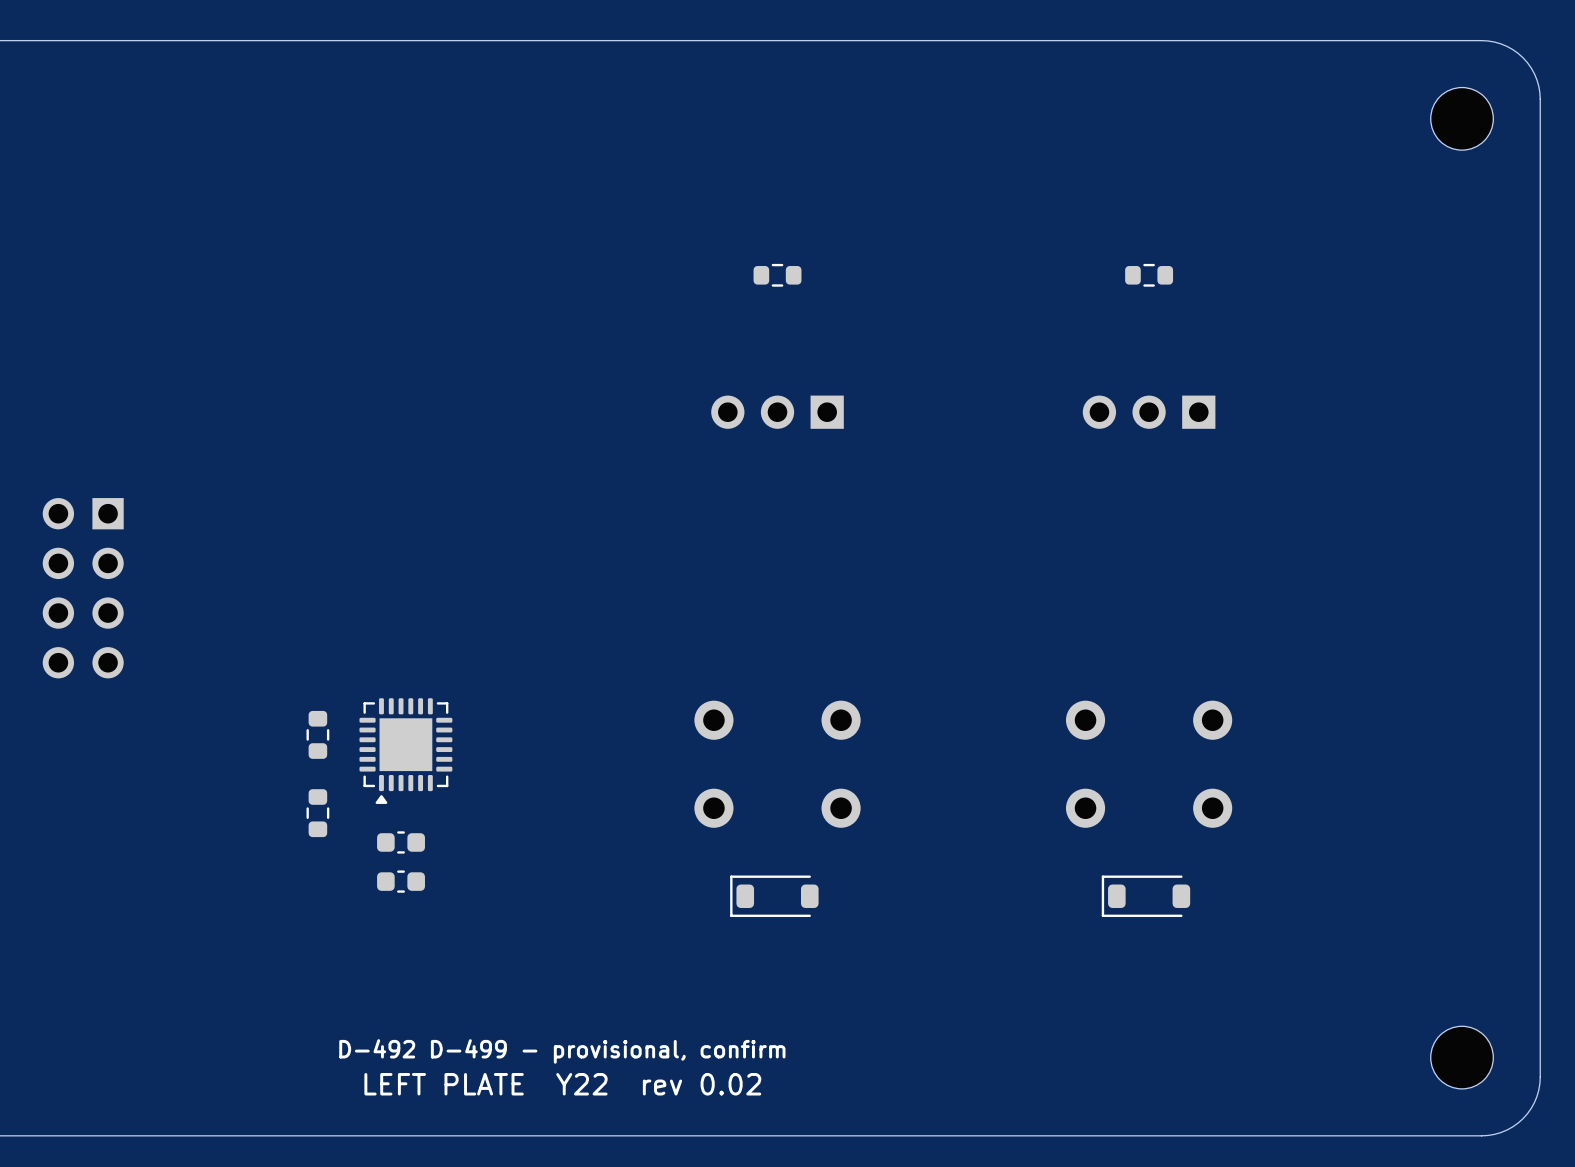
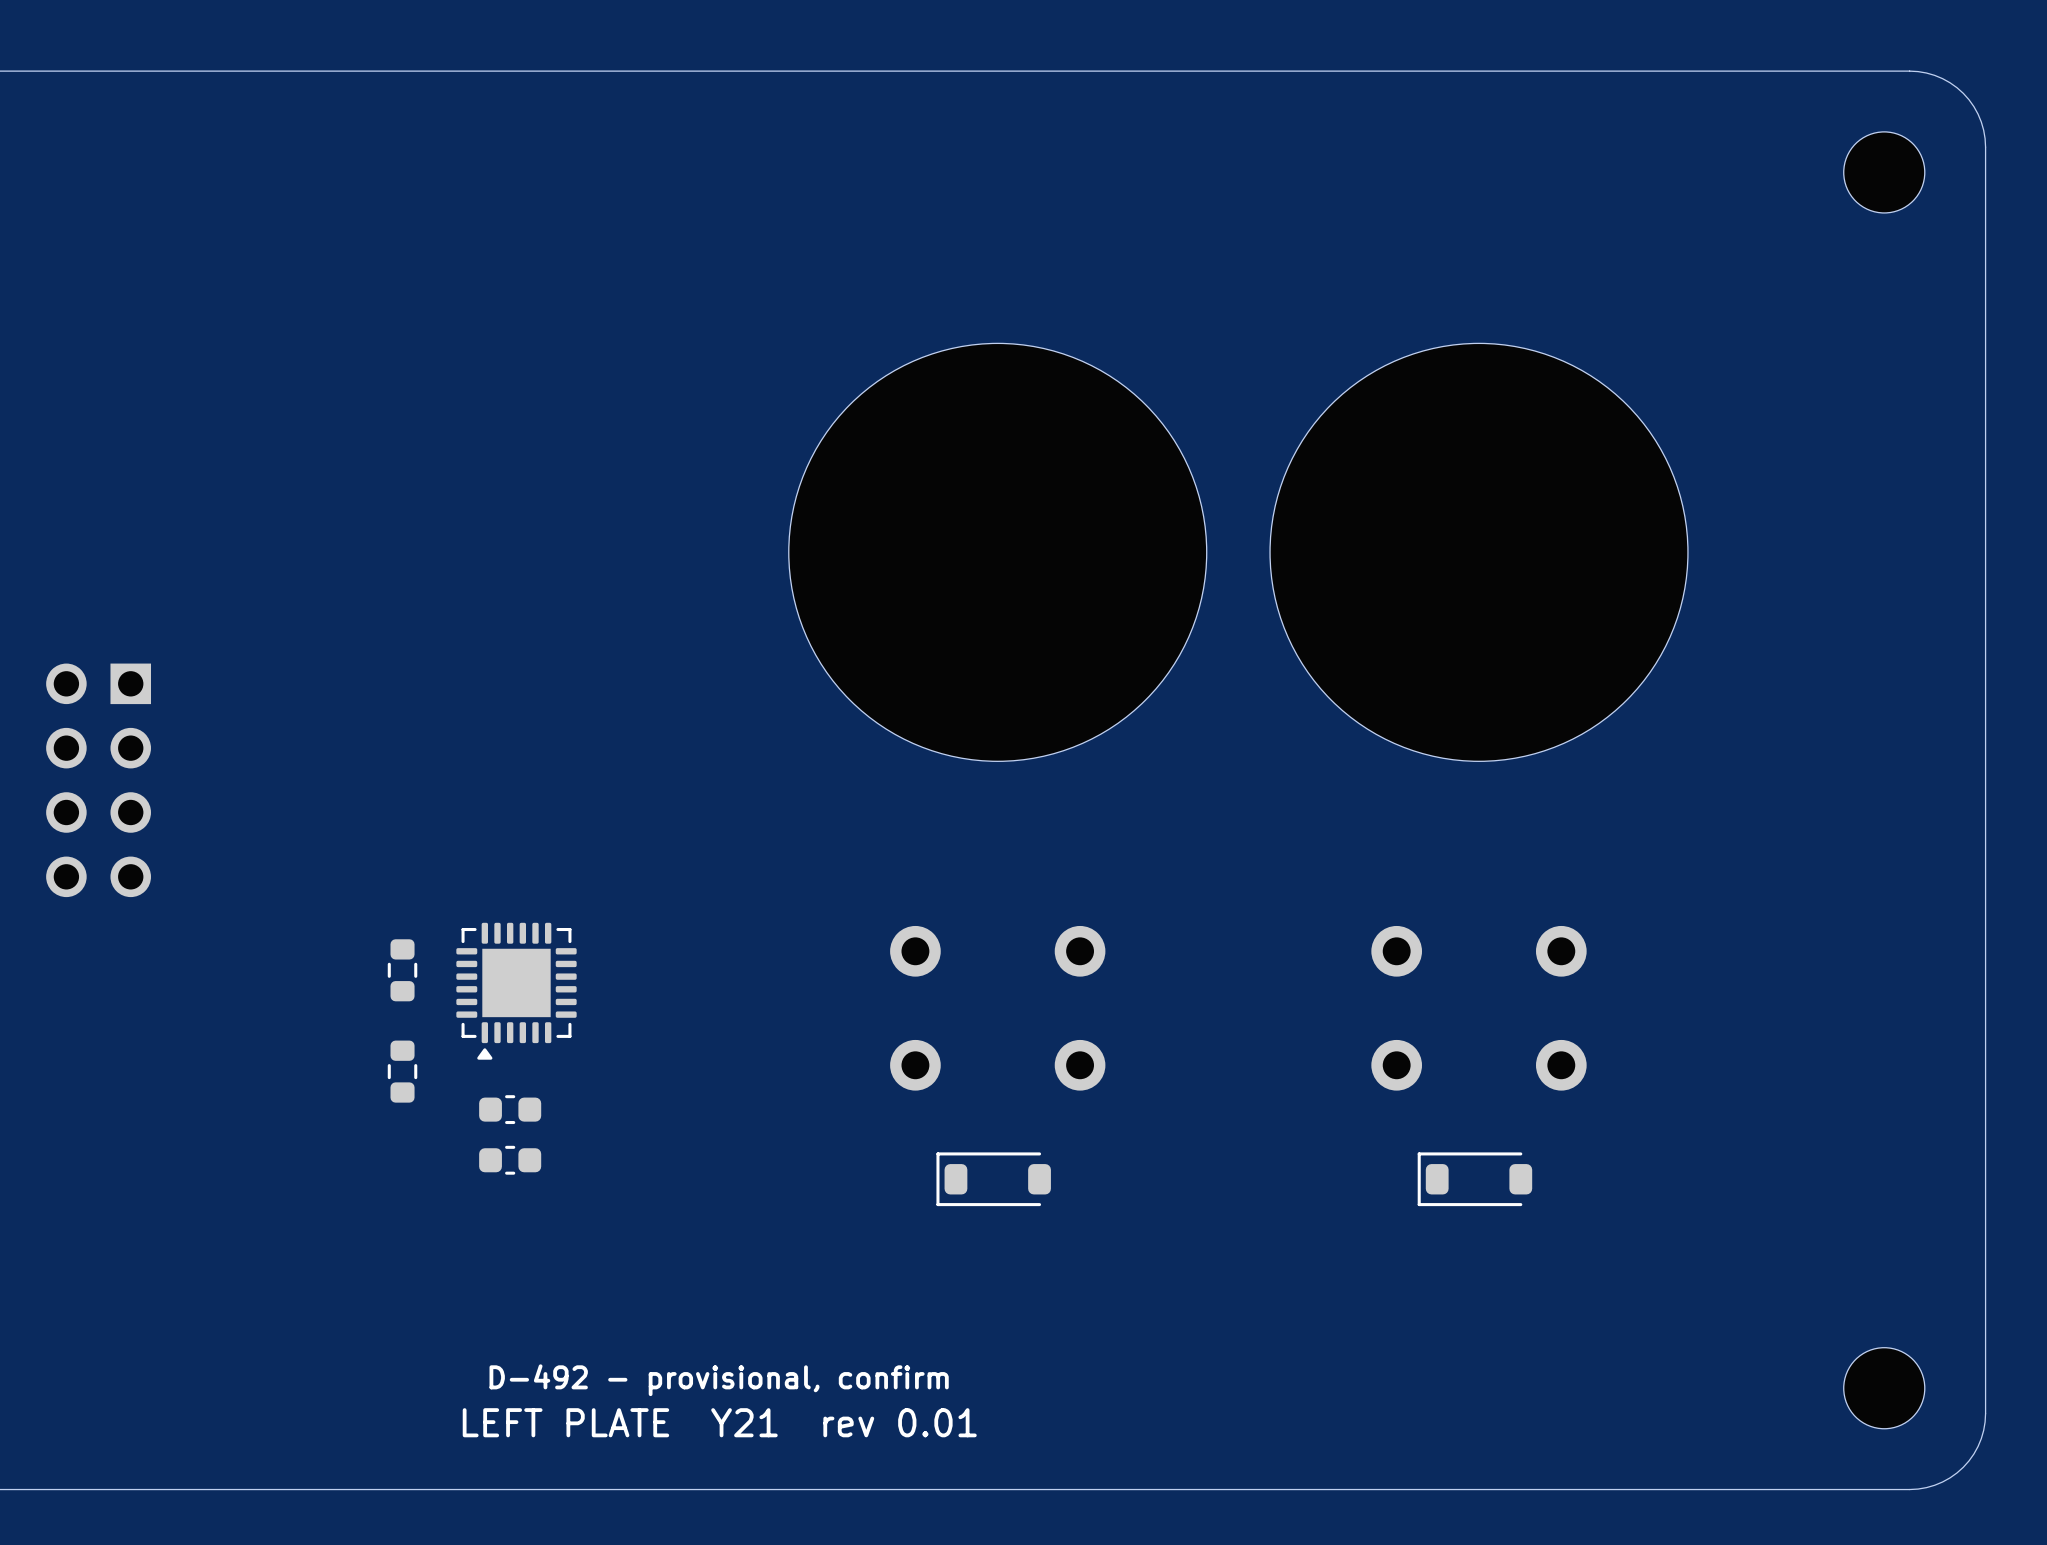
part: (777, 275) -> none
part: (1149, 275) -> none
part footprint: [711, 395, 844, 429] -> [788, 343, 1207, 762]
part footprint: [1082, 395, 1216, 429] -> [1270, 343, 1688, 762]
text: D-492 D-499 - provisional, confirm (562, 1051) -> D-492 - provisional, confirm (719, 1380)
text: LEFT PLATE Y22 rev 0.02 (562, 1084) -> LEFT PLATE Y21 rev 0.01 (719, 1422)

